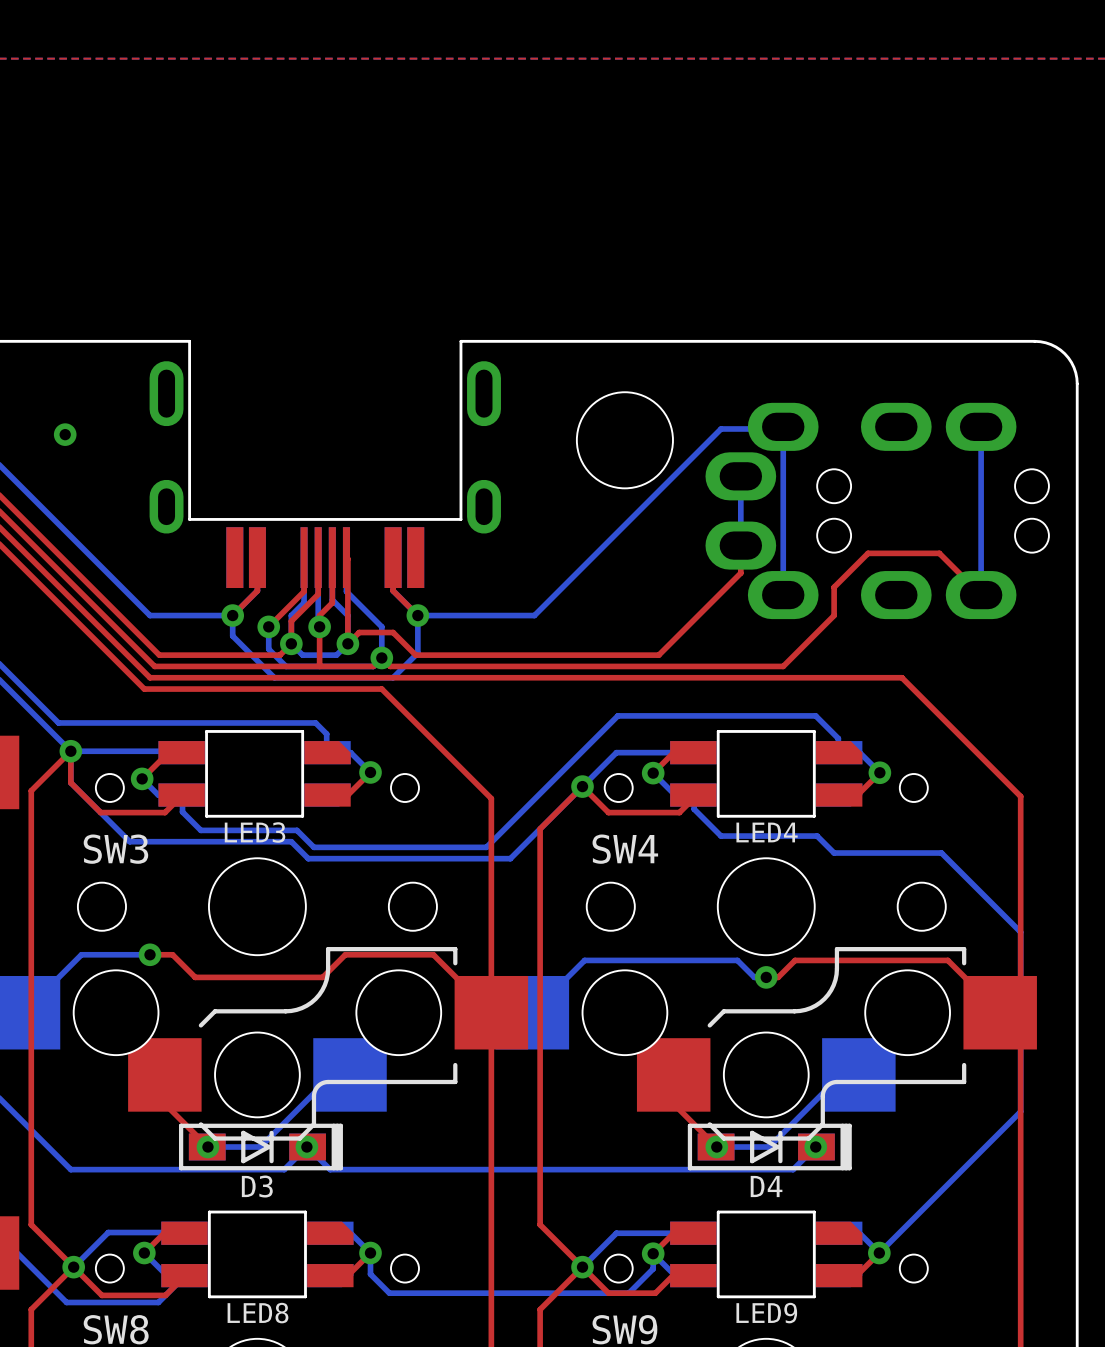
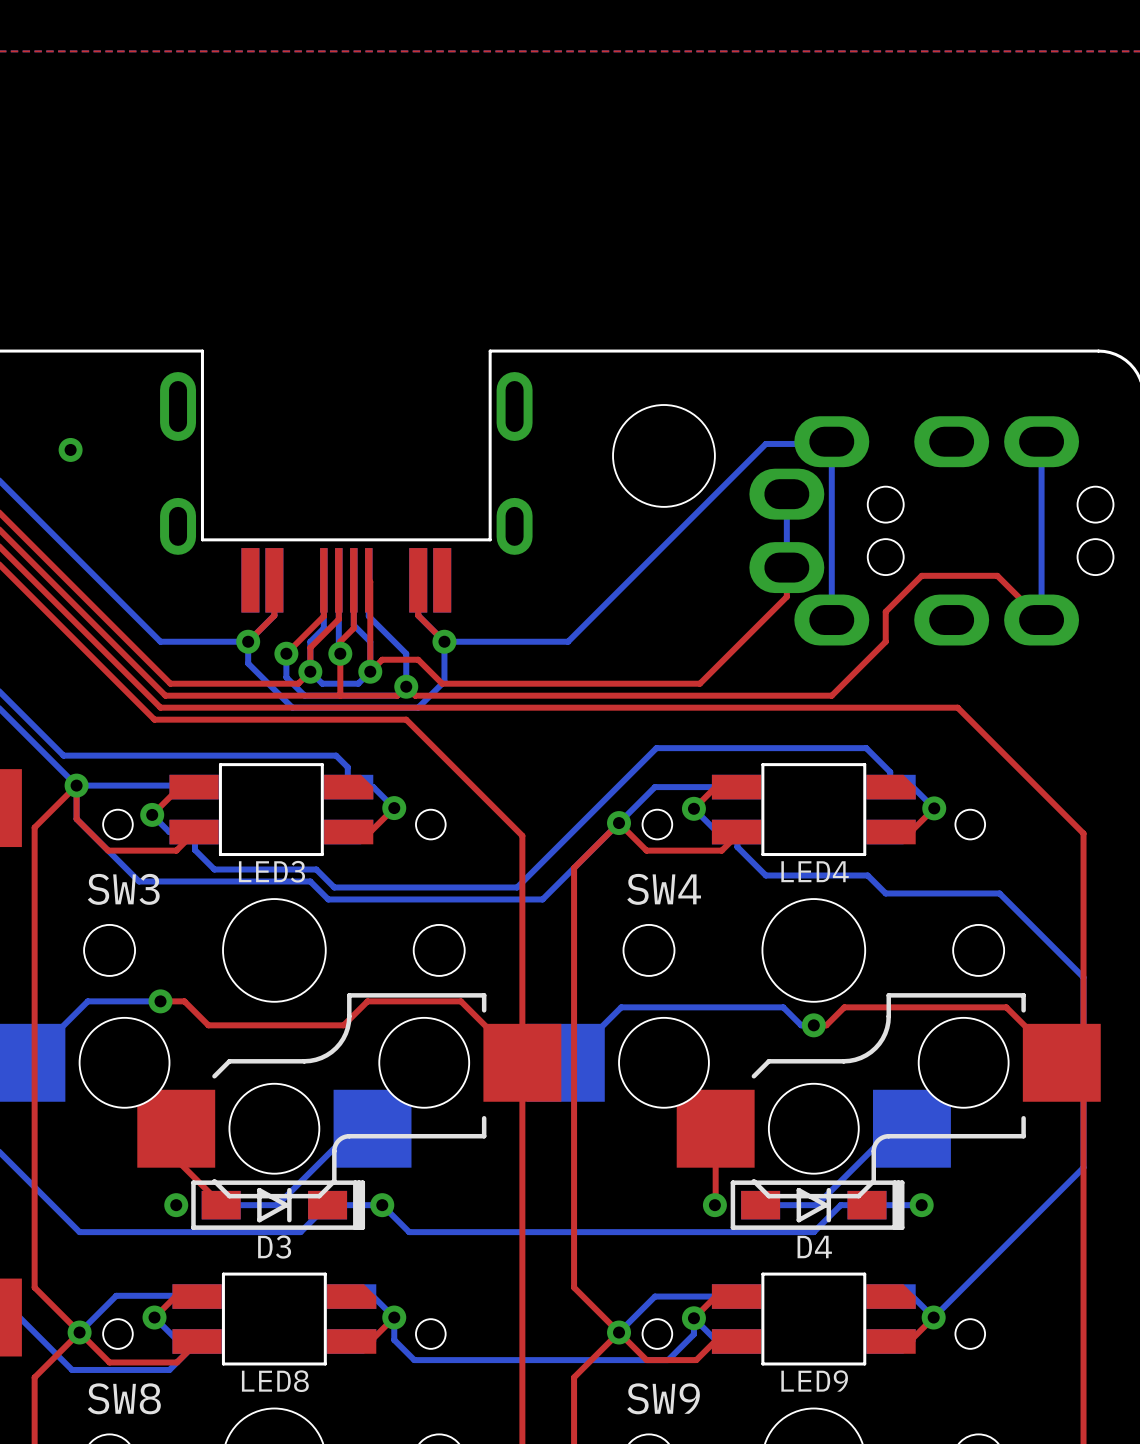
top track: (673, 1103) (716, 1147) -> (715, 1159) (715, 1204)
via position: (207, 1147) -> (176, 1205)
bottom track: (306, 1147) (284, 1169) (70, 1169) -> (921, 1205) (840, 1205) (813, 1232) (409, 1232) (382, 1205) (327, 1205) (300, 1232) (79, 1232) (76, 1229)
via position: (306, 1147) -> (382, 1205)
bottom track: (307, 1147) (330, 1169) (793, 1169) (815, 1147) -> none
via position: (716, 1147) -> (714, 1205)
via position: (815, 1147) -> (921, 1205)

